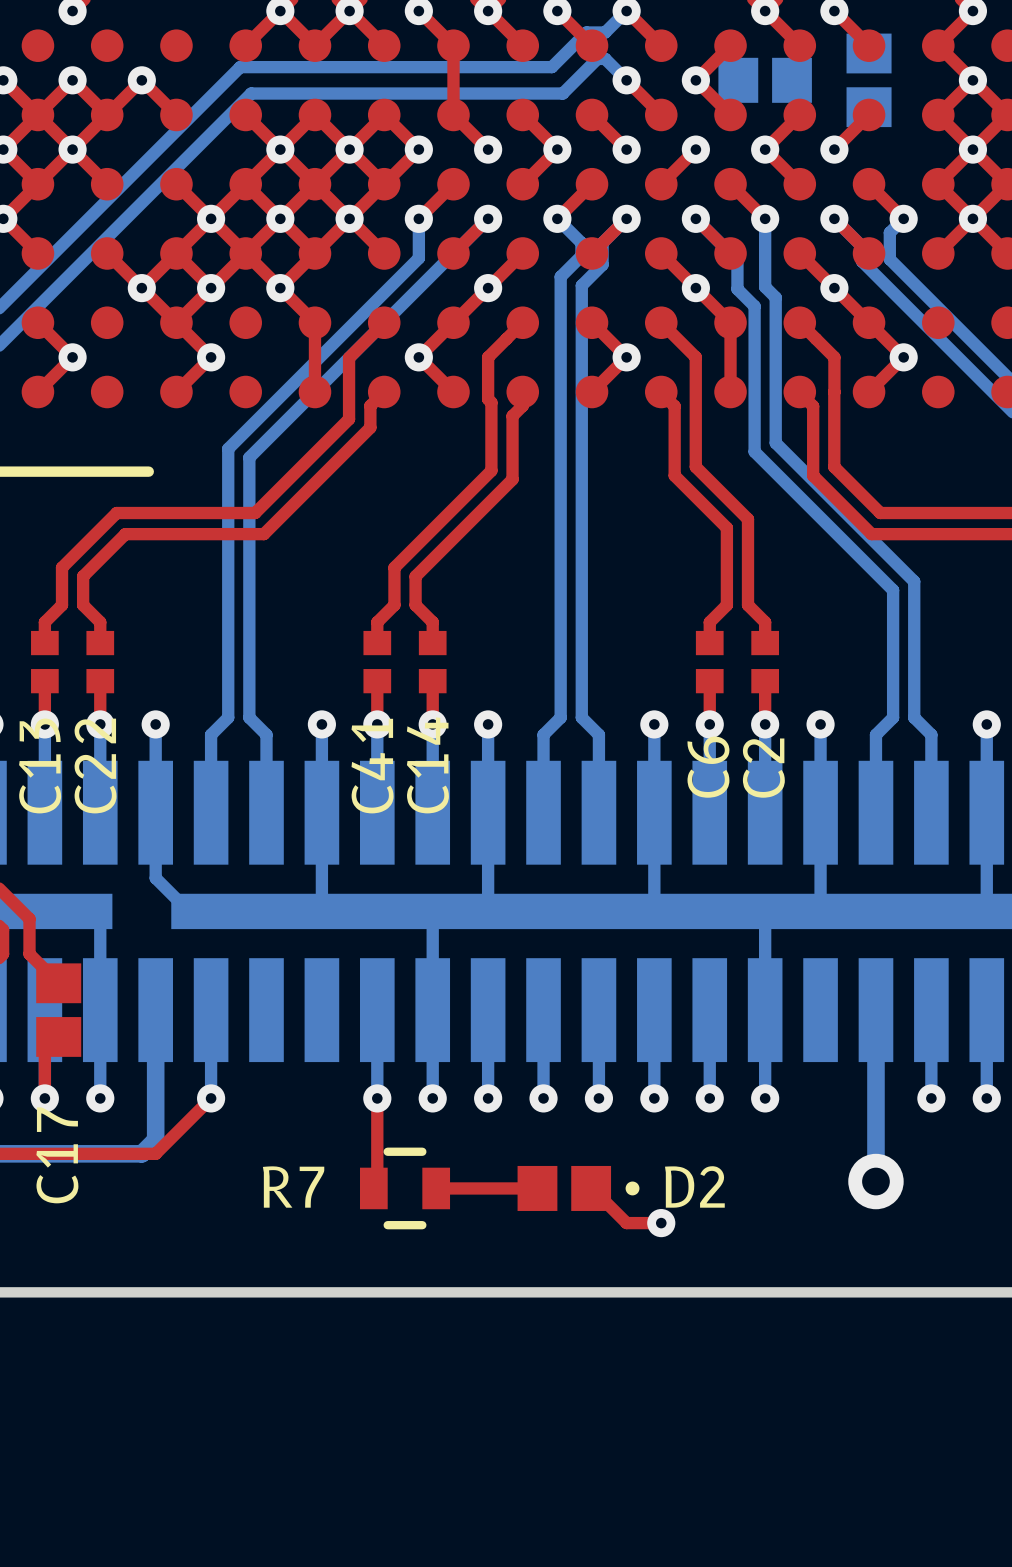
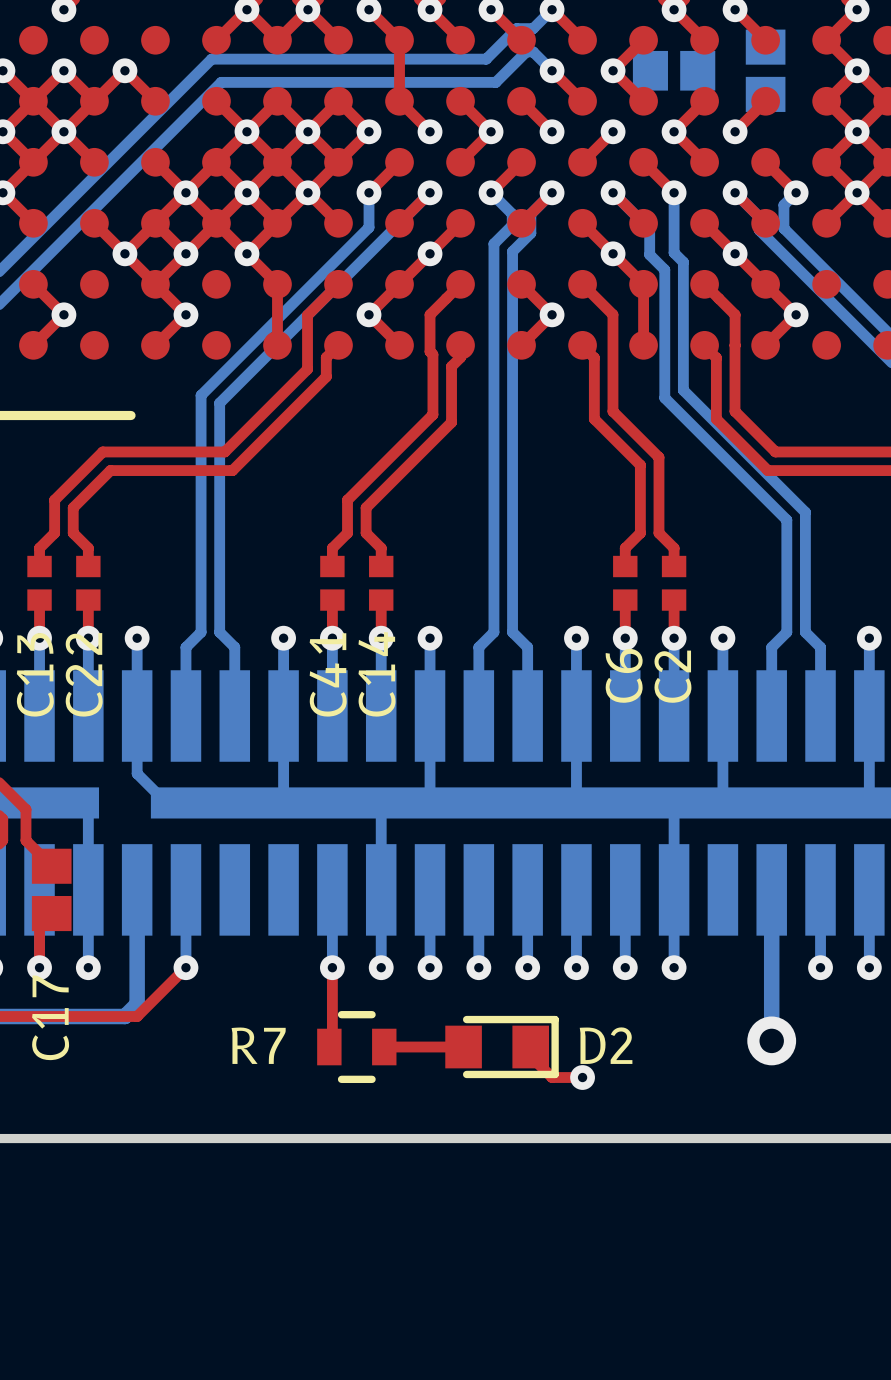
D2 footprint: [517, 1165, 640, 1211] -> [445, 1015, 559, 1079]

